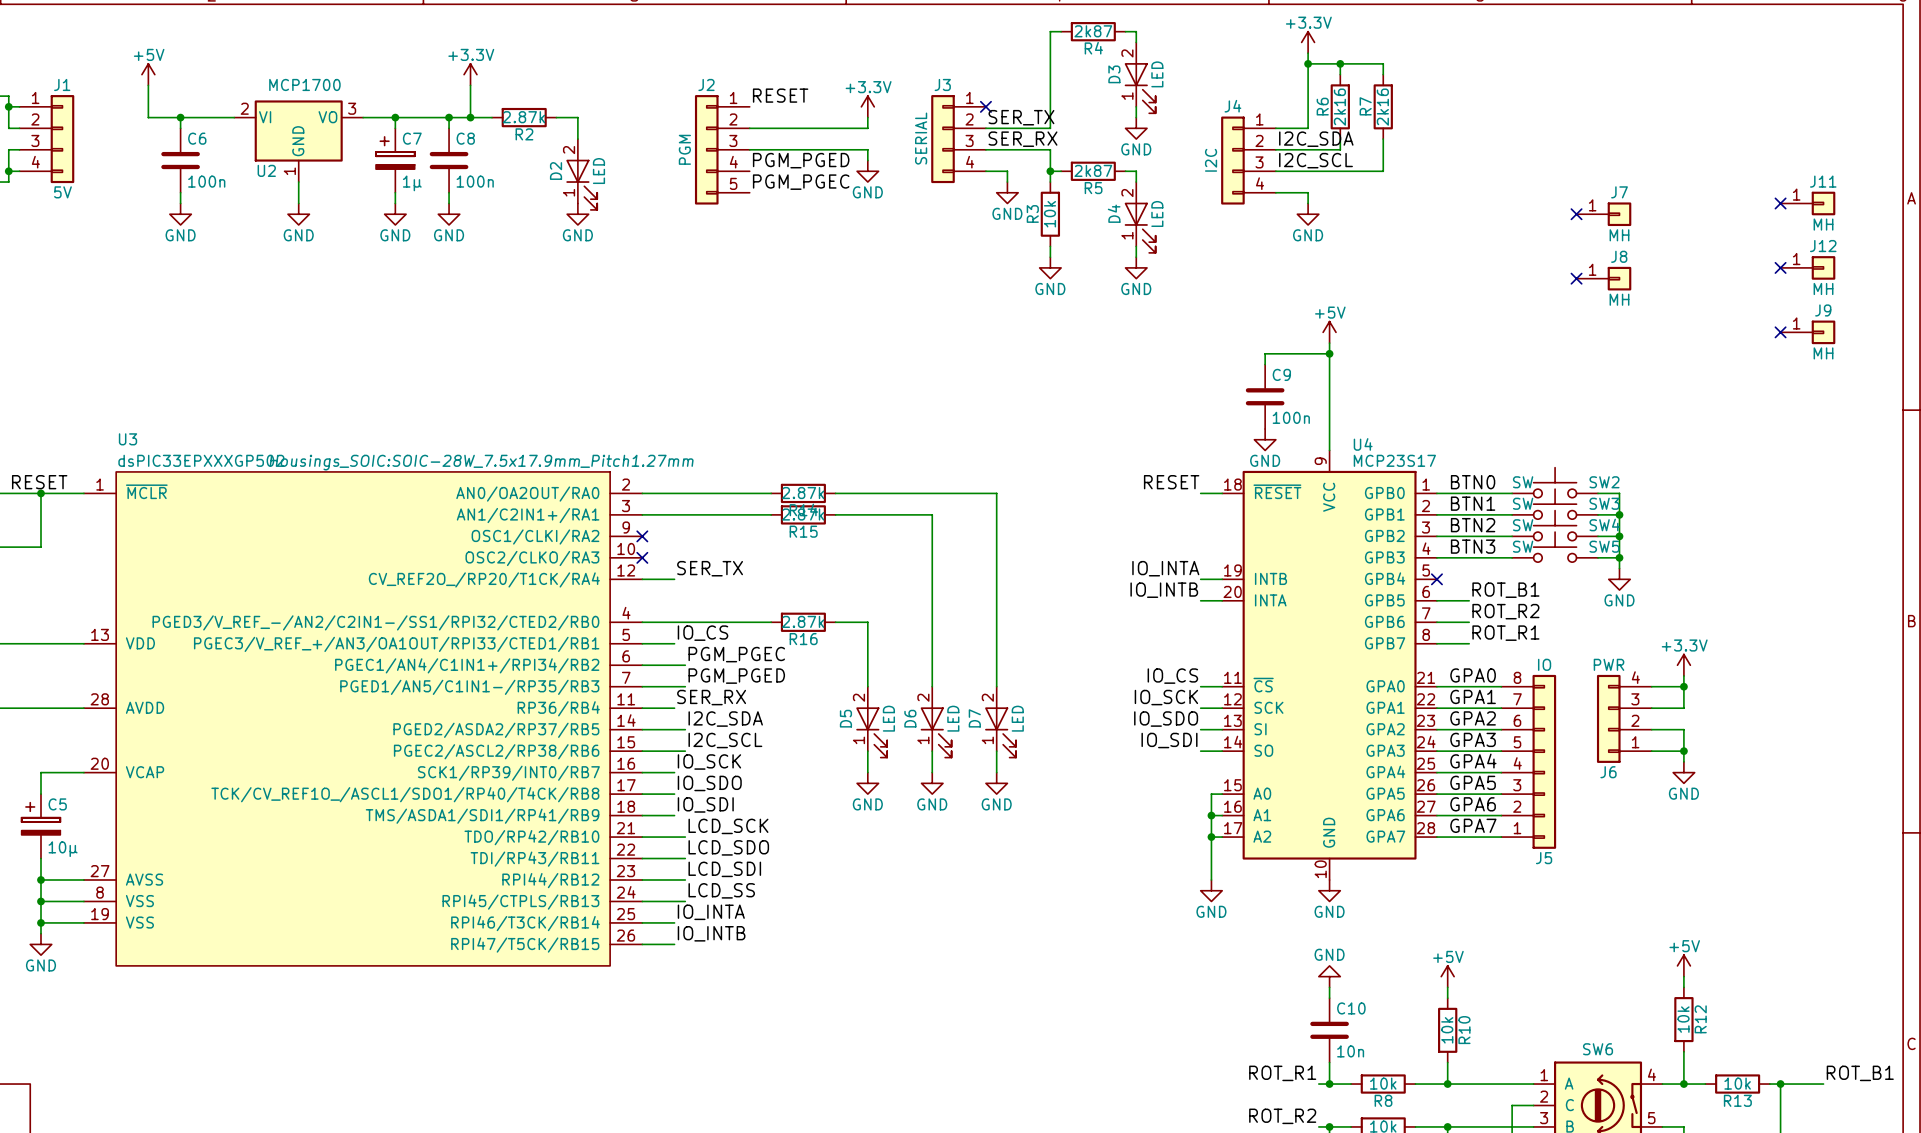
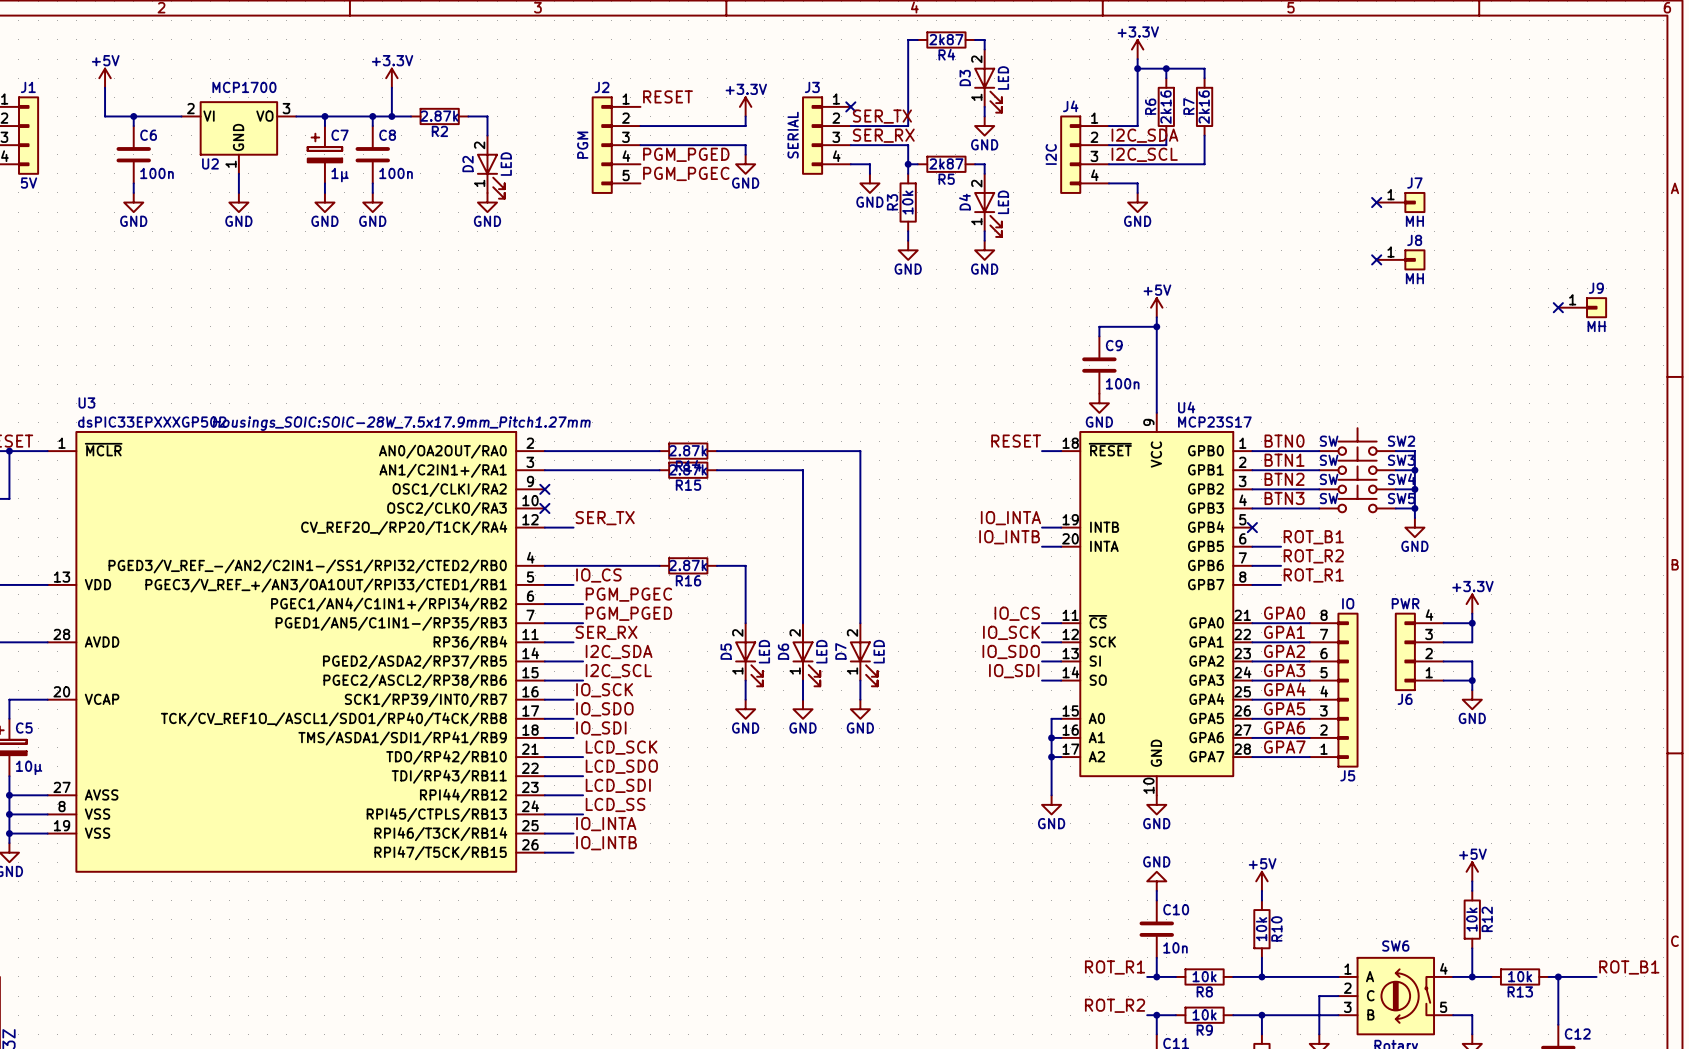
no-connect mark: (1780, 203) -> none
J11: MH (1807, 203) -> none
no-connect mark: (1780, 267) -> none
J12: MH (1807, 267) -> none

